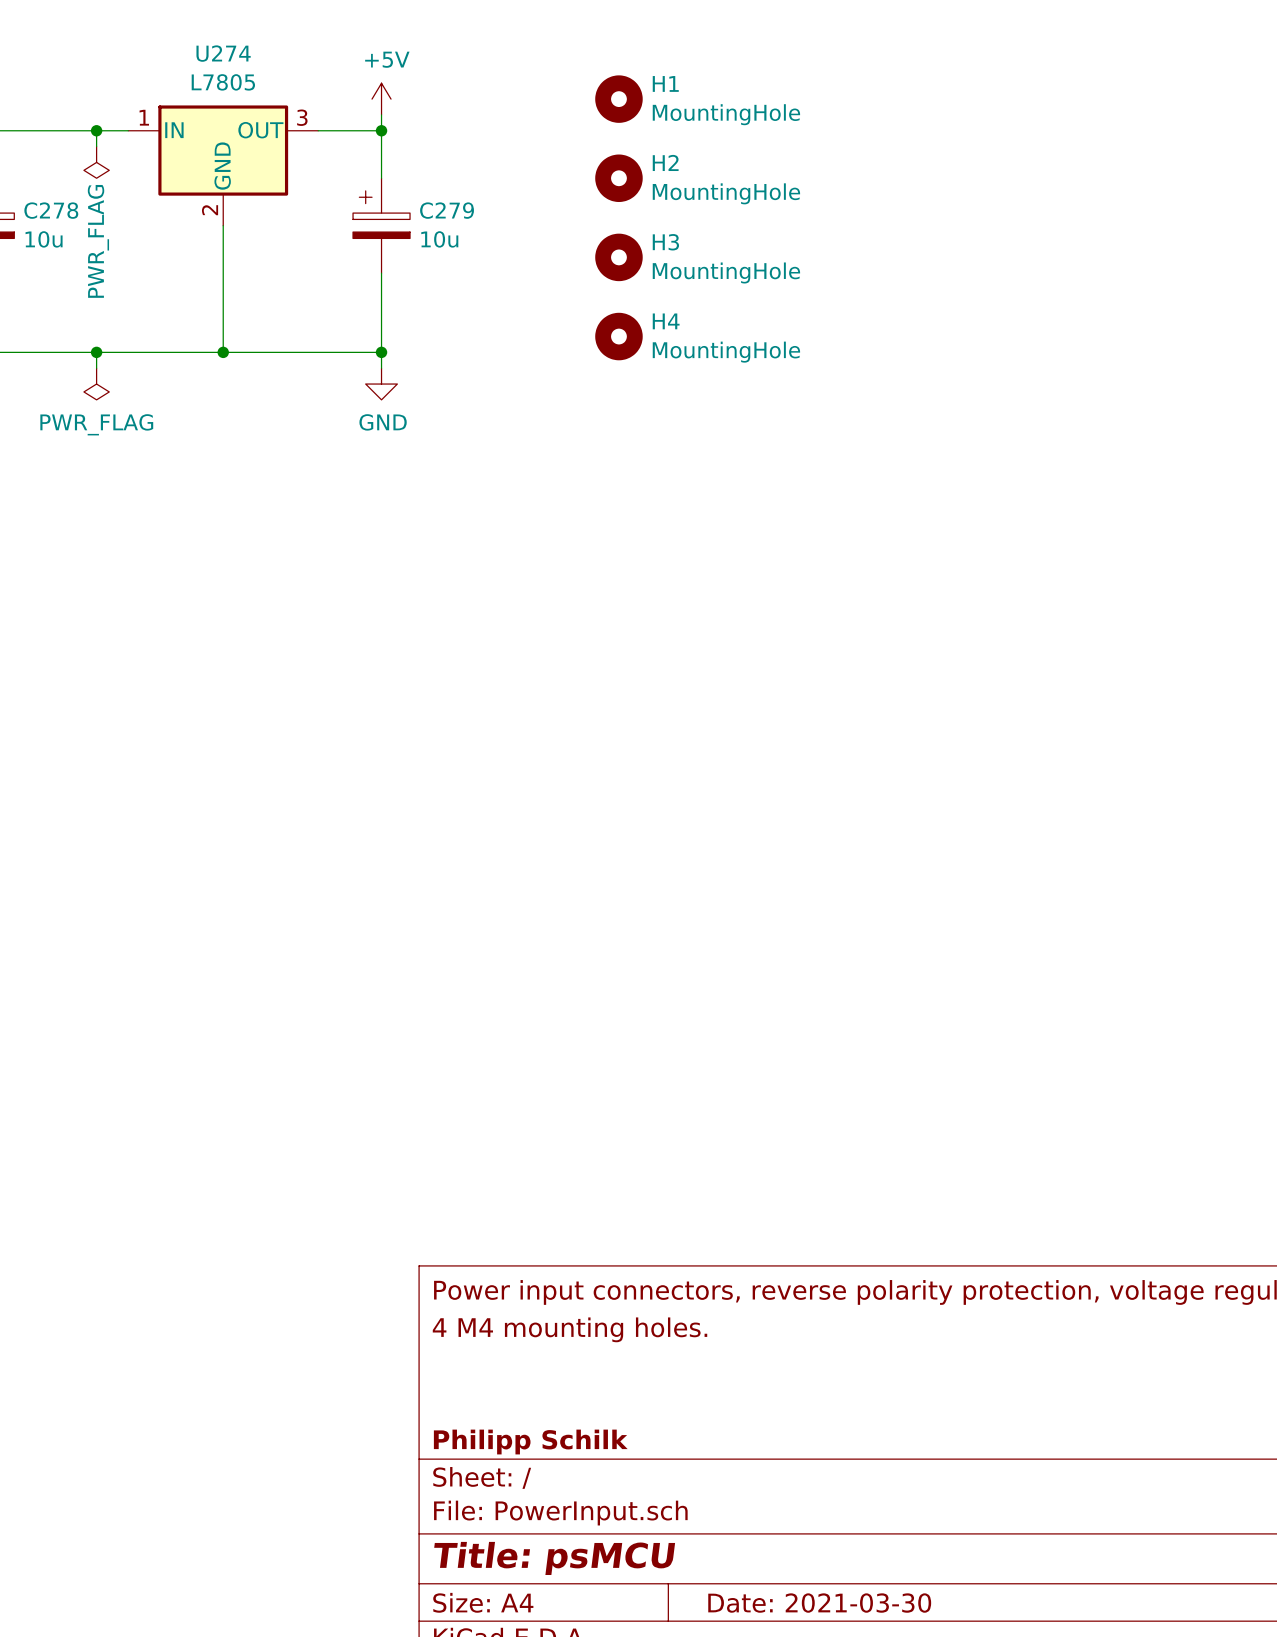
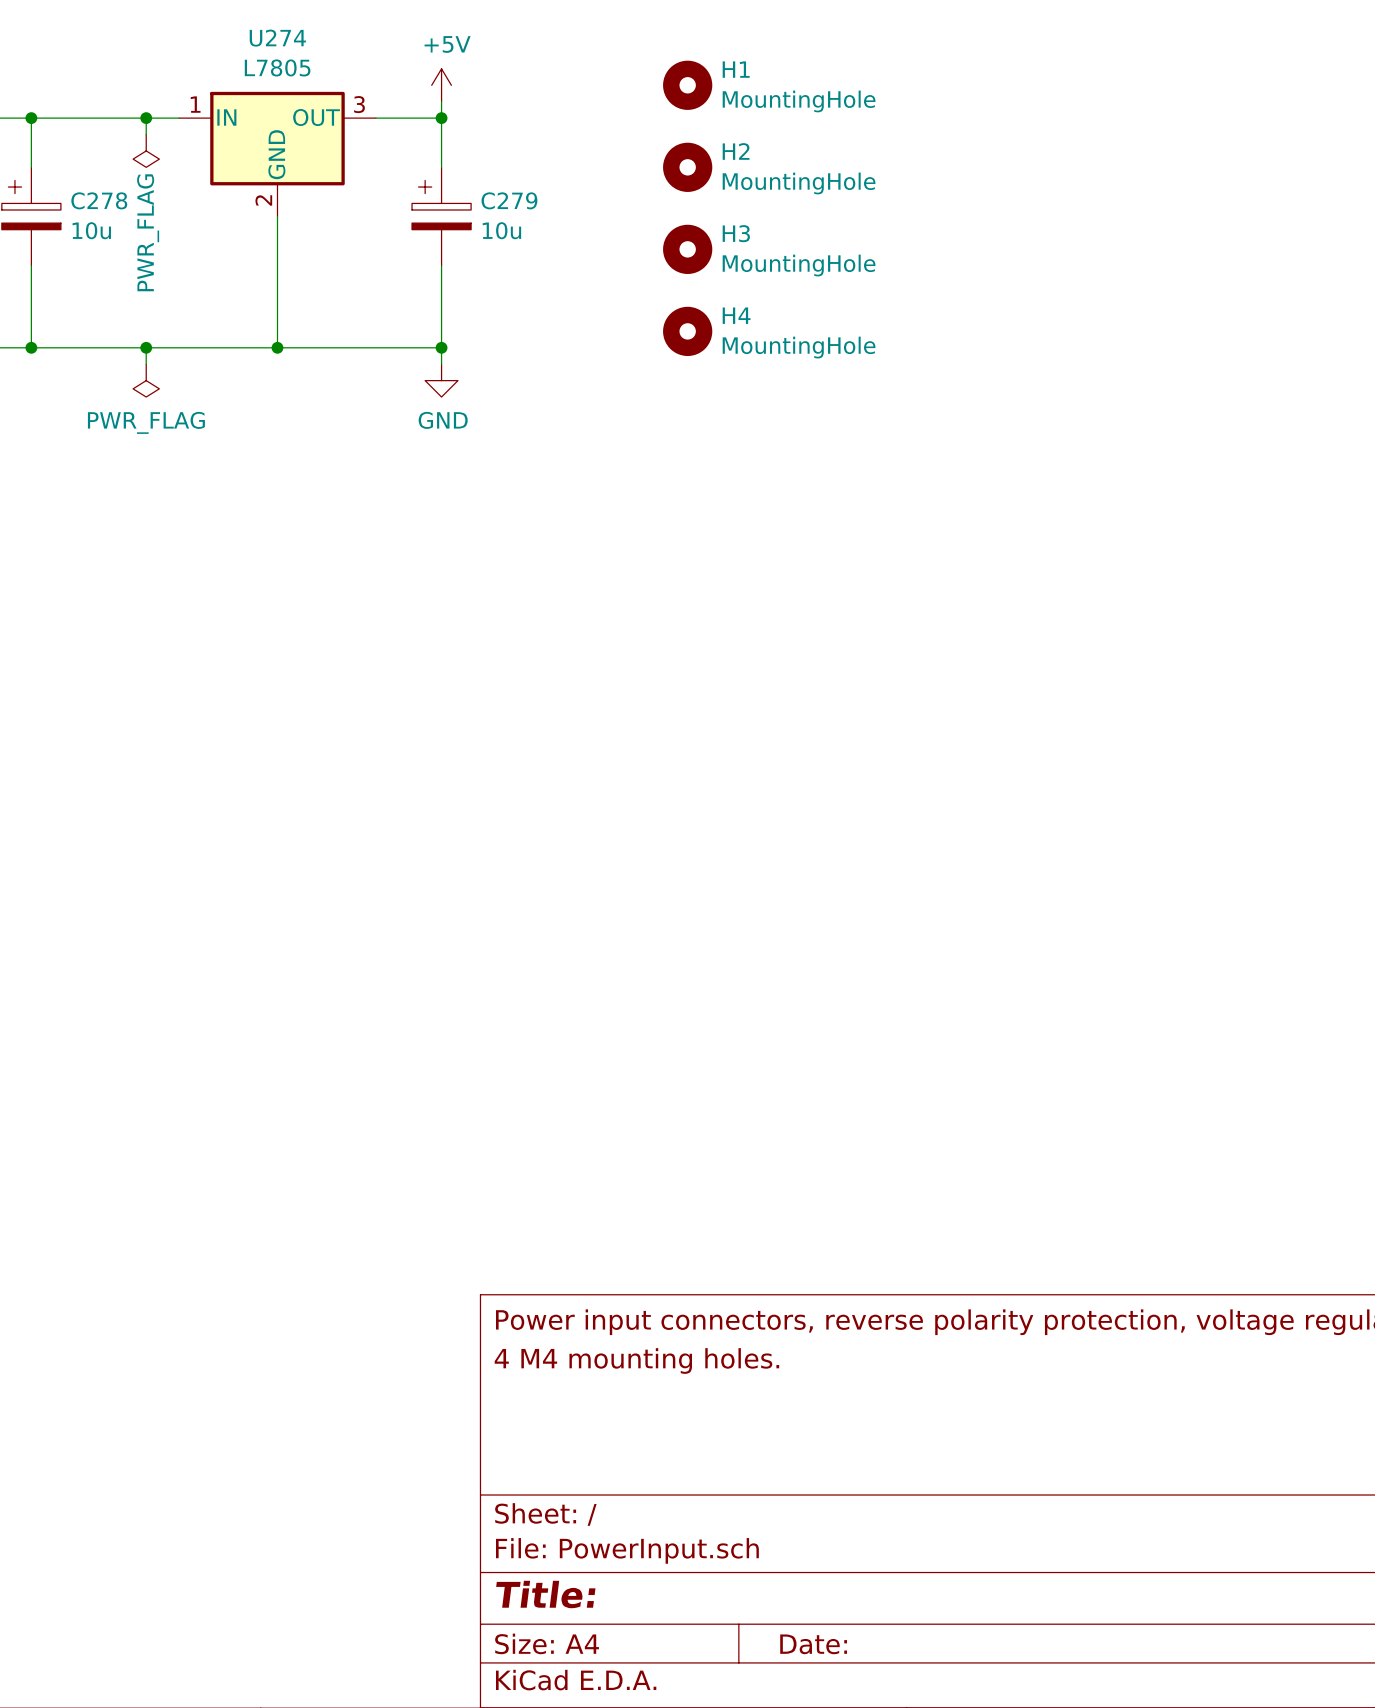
title block: Philipp Schilk (530, 1442) -> none
title block: Title: psMCU (554, 1558) -> Title: (545, 1594)
title block: Date: 2021-03-30 (819, 1603) -> Date: (813, 1644)

